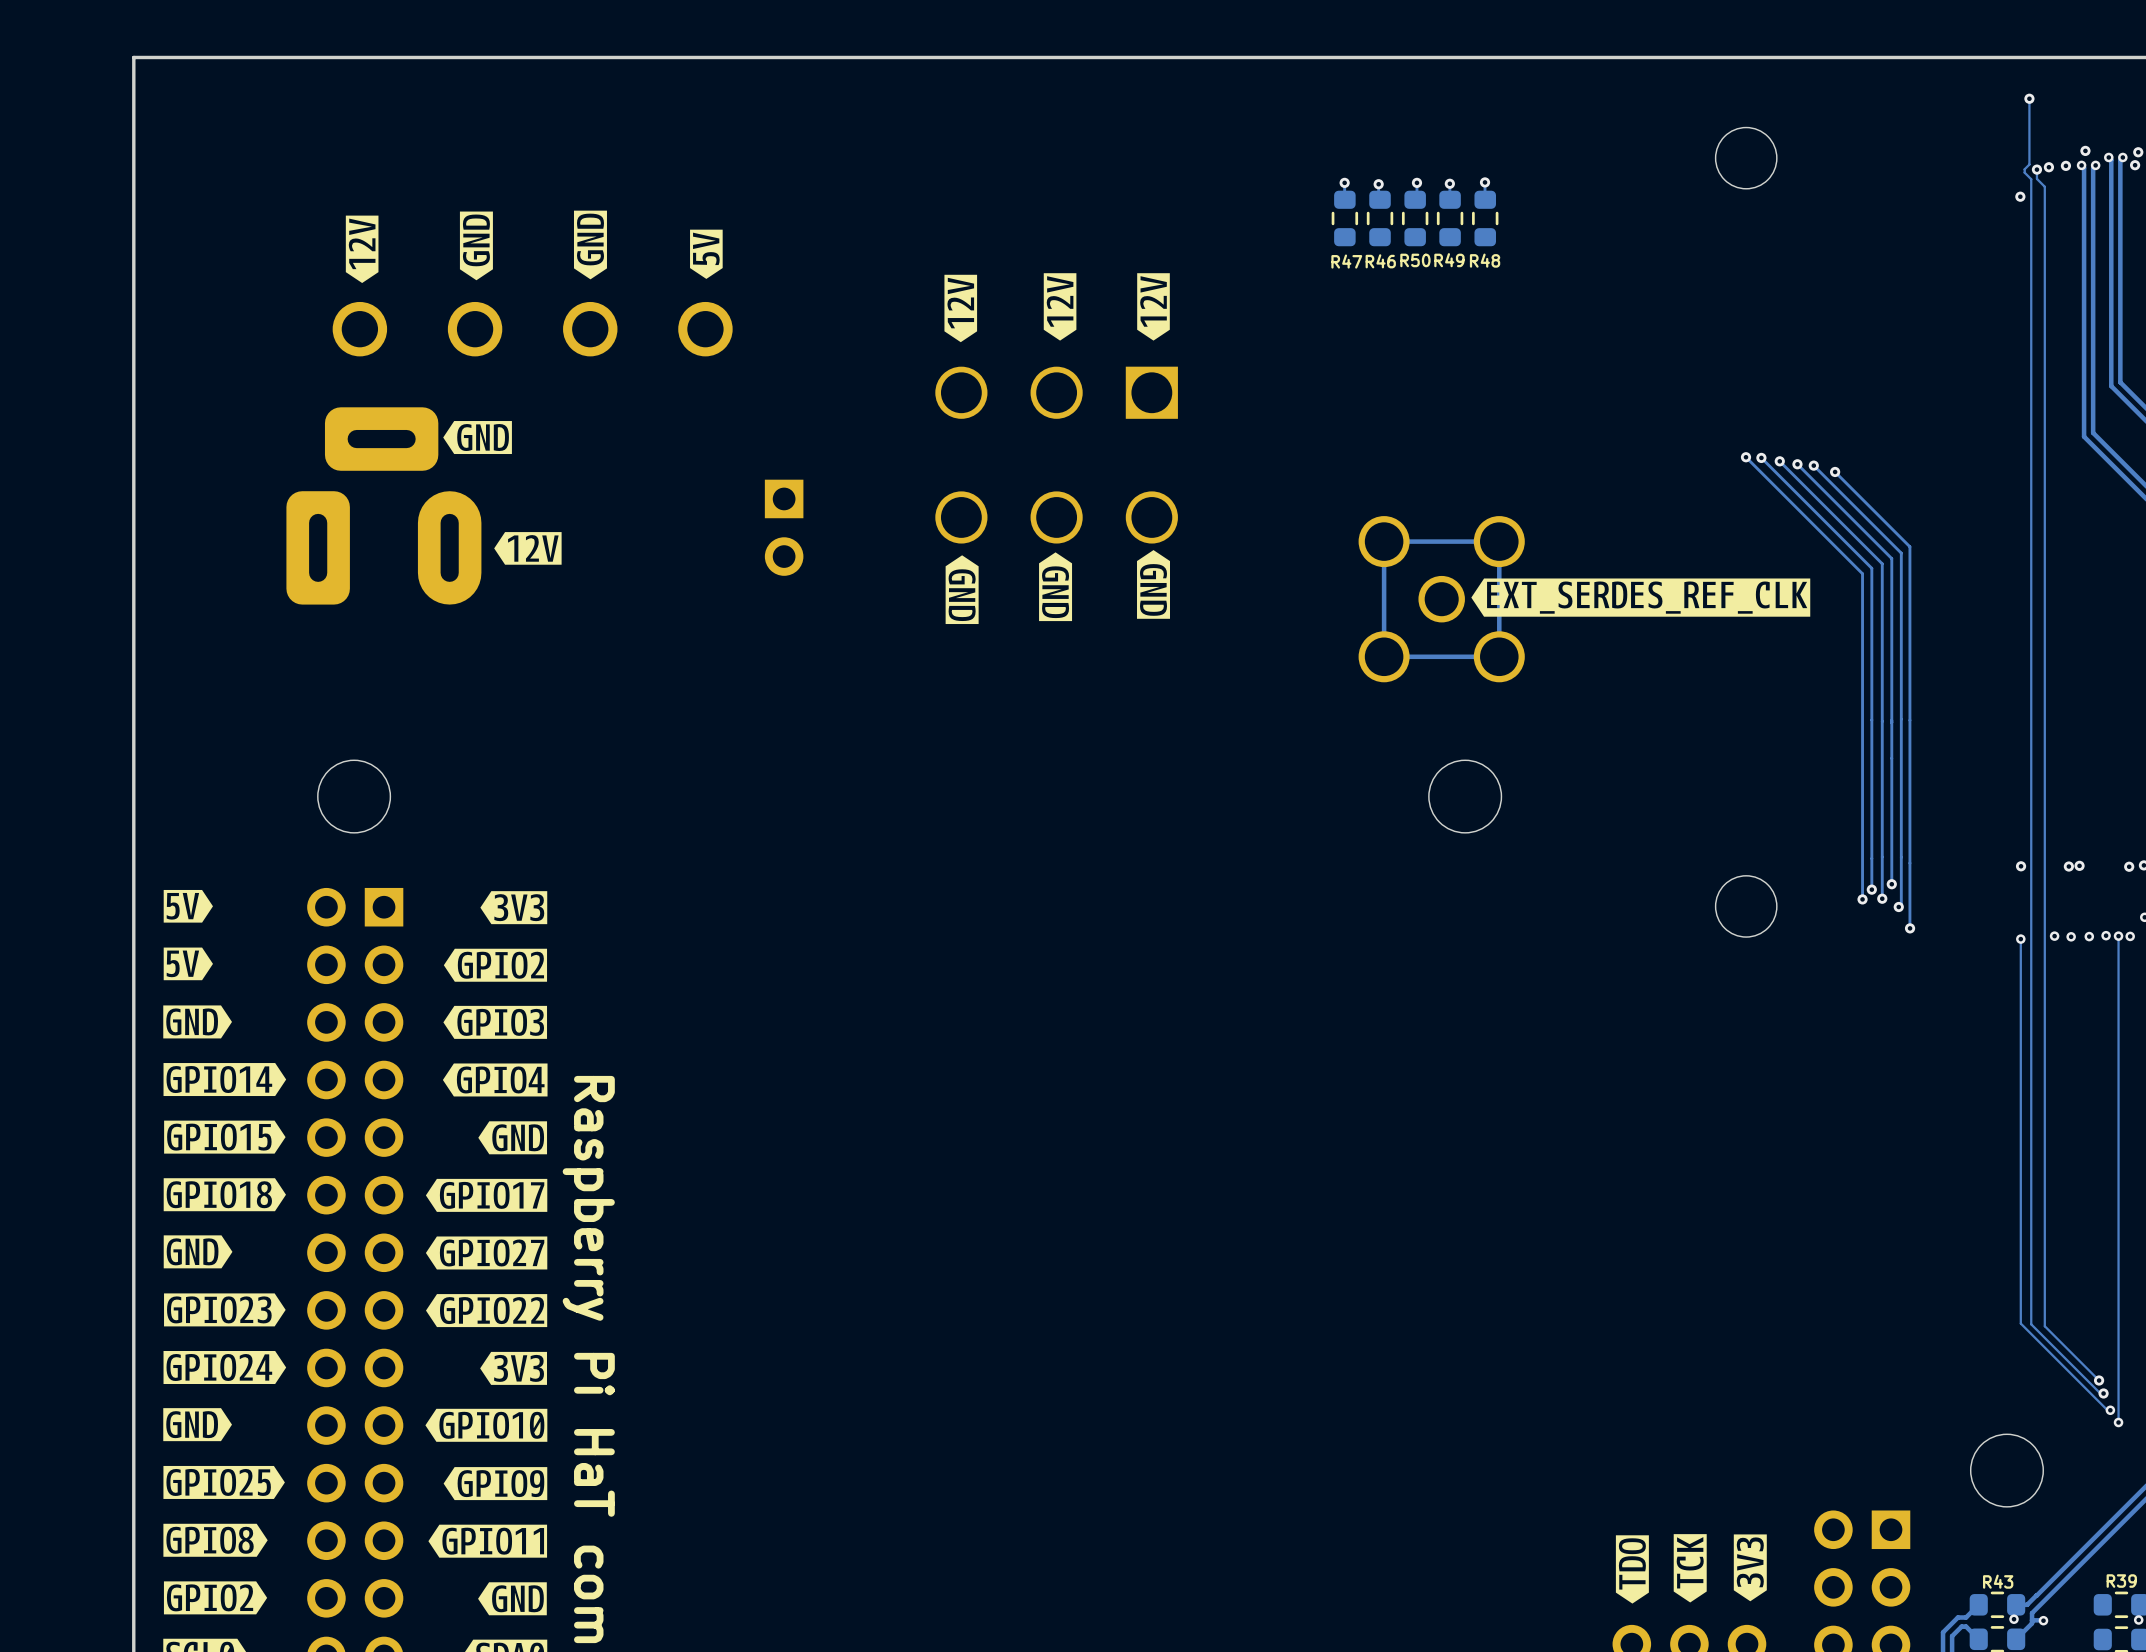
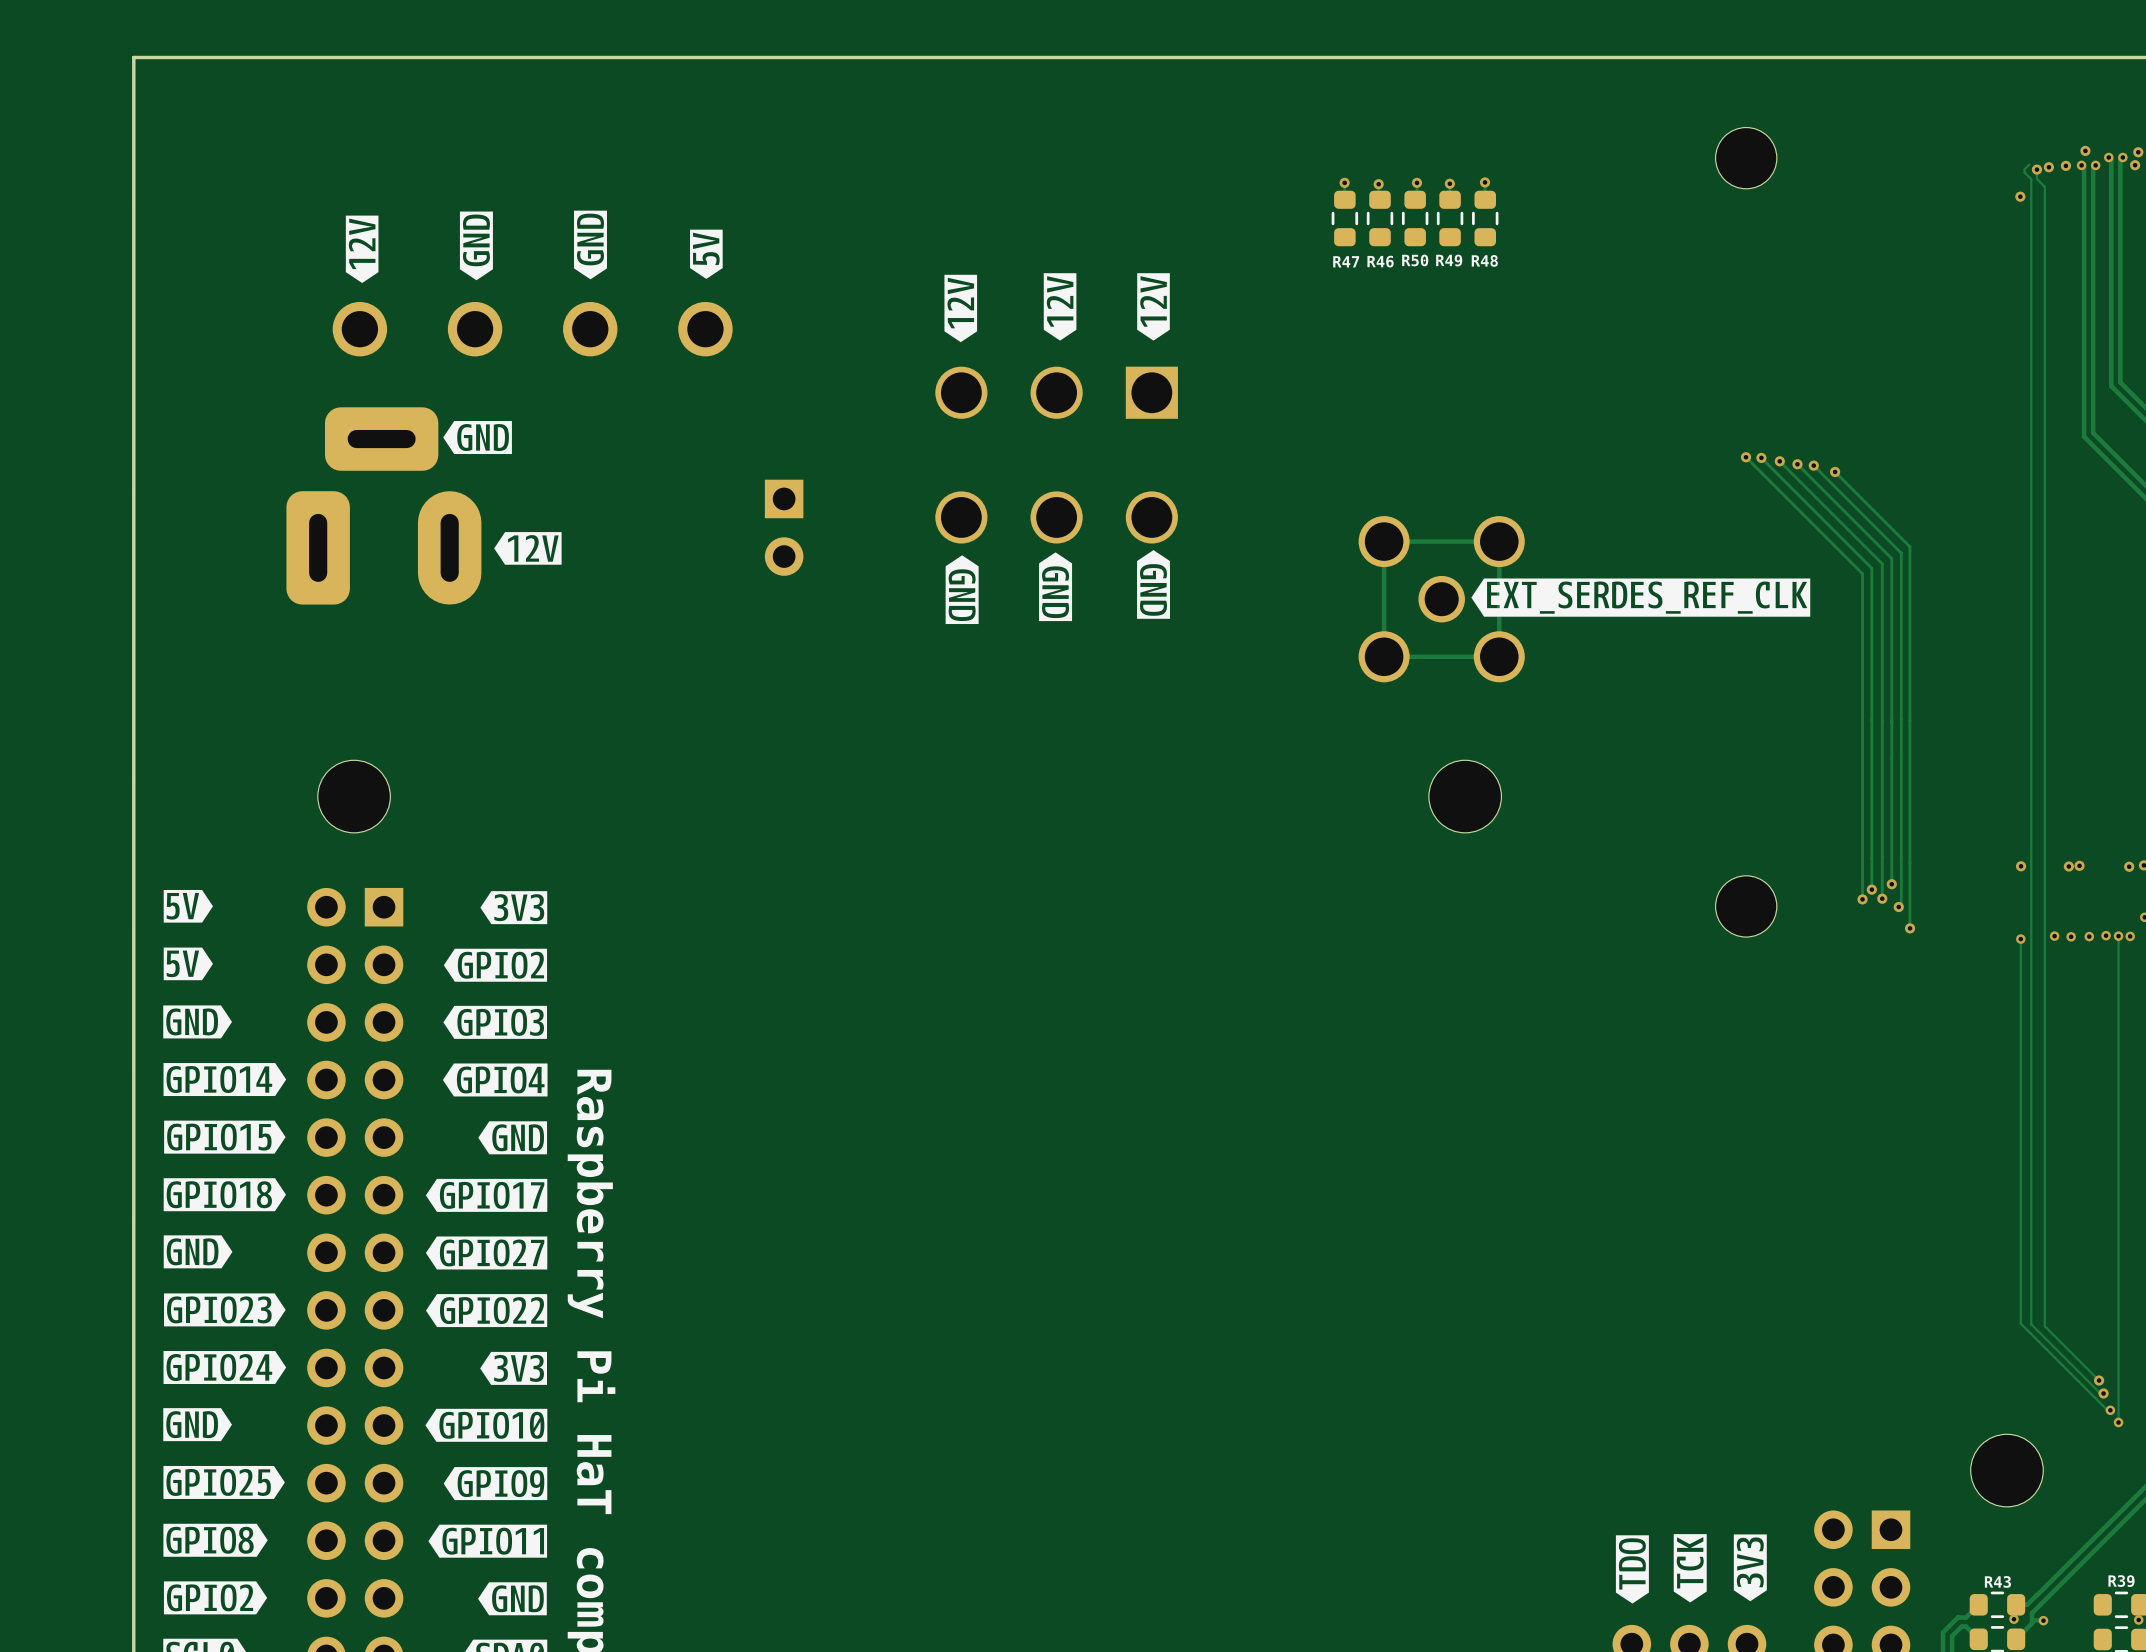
track: (2029, 98) (2029, 164) -> none
via: (2029, 98) -> none

